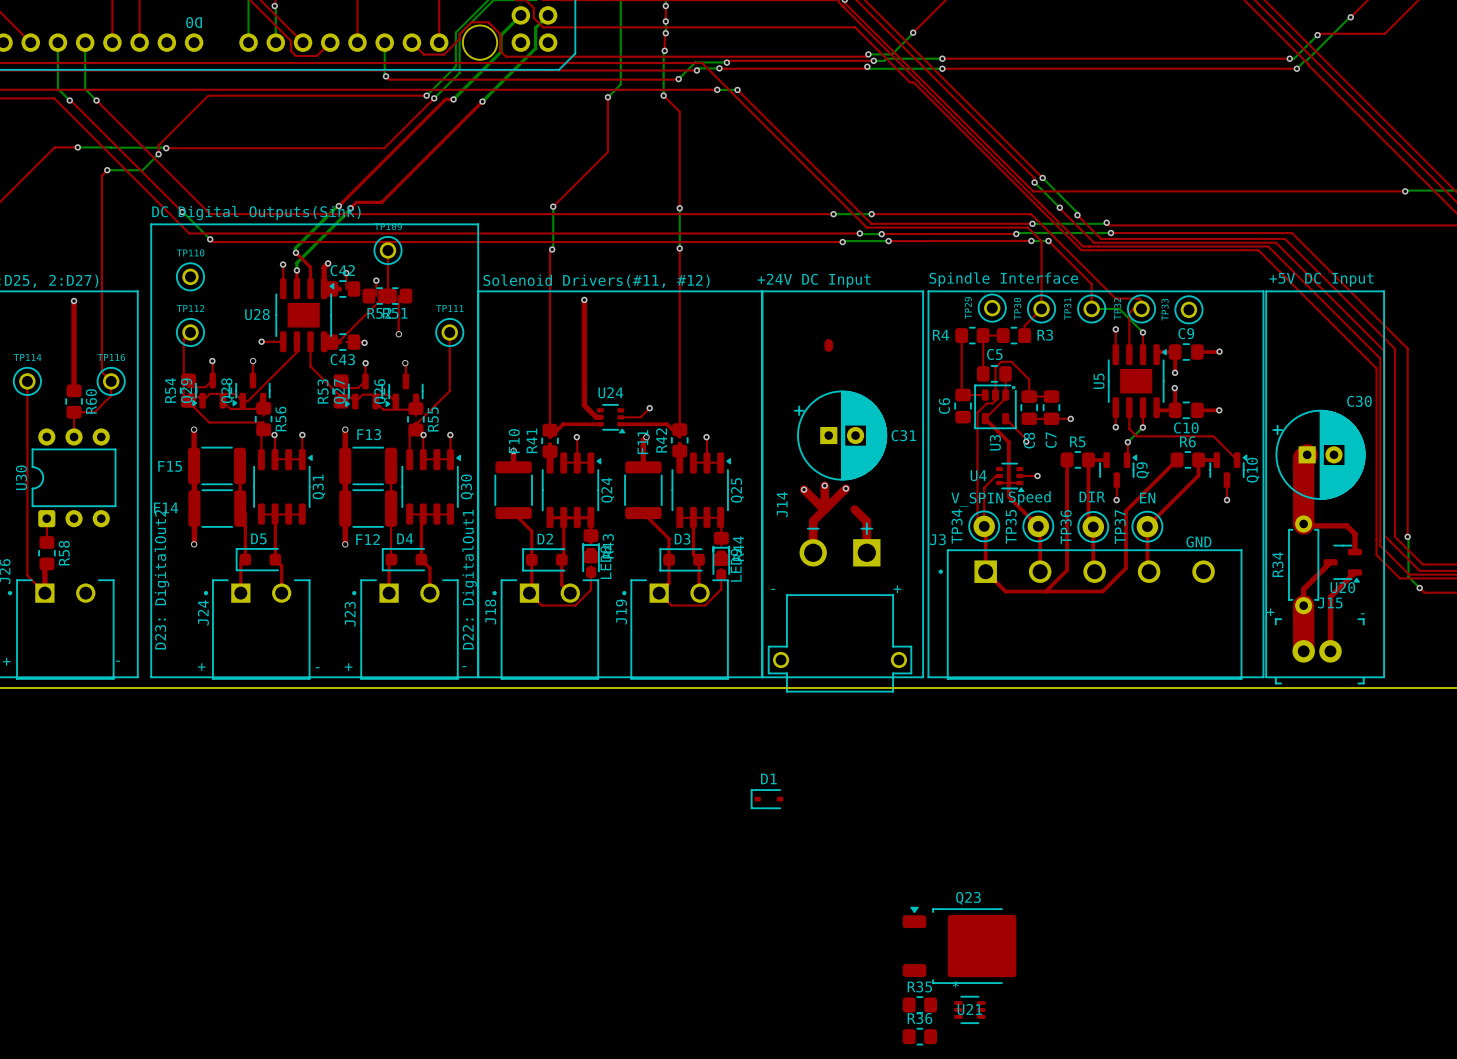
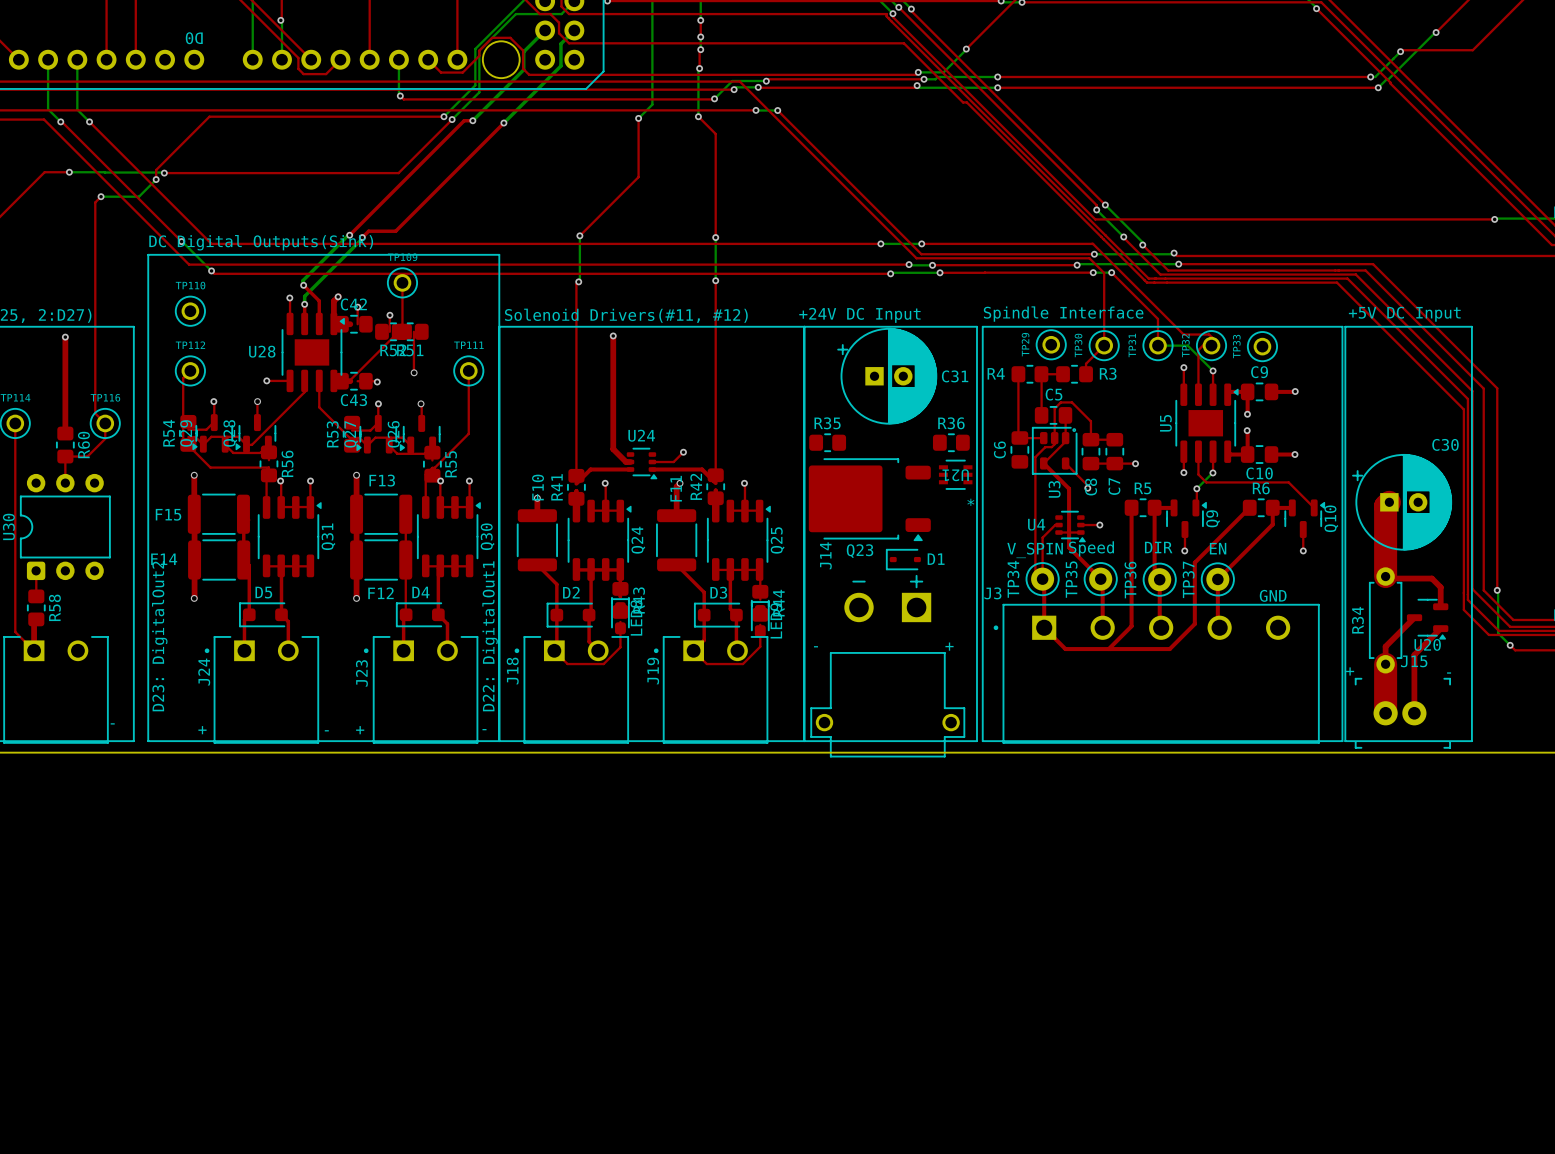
top track: (828, 343) (828, 347) -> none
C31 position: (840, 435) -> (887, 376)
top track: (824, 485) (824, 509) (813, 521) (813, 552) -> none
via: (824, 485) -> none
top track: (845, 488) (825, 509) -> none
via: (845, 488) -> none
top track: (804, 489) (823, 509) -> none
via: (804, 489) -> none
top track: (854, 509) (866, 521) (866, 552) -> none
D1 name position: D1 (768, 778) -> D1 (936, 559)
D1 position: (767, 799) -> (903, 559)
Q23 rotation: 0° (959, 945) -> 180° (869, 499)
Q23 position: (959, 945) -> (869, 499)
R35 position: (919, 1005) -> (827, 442)
U21 rotation: 0° (969, 1009) -> 180° (955, 474)
U21 position: (969, 1009) -> (955, 474)
R36 position: (919, 1036) -> (951, 442)

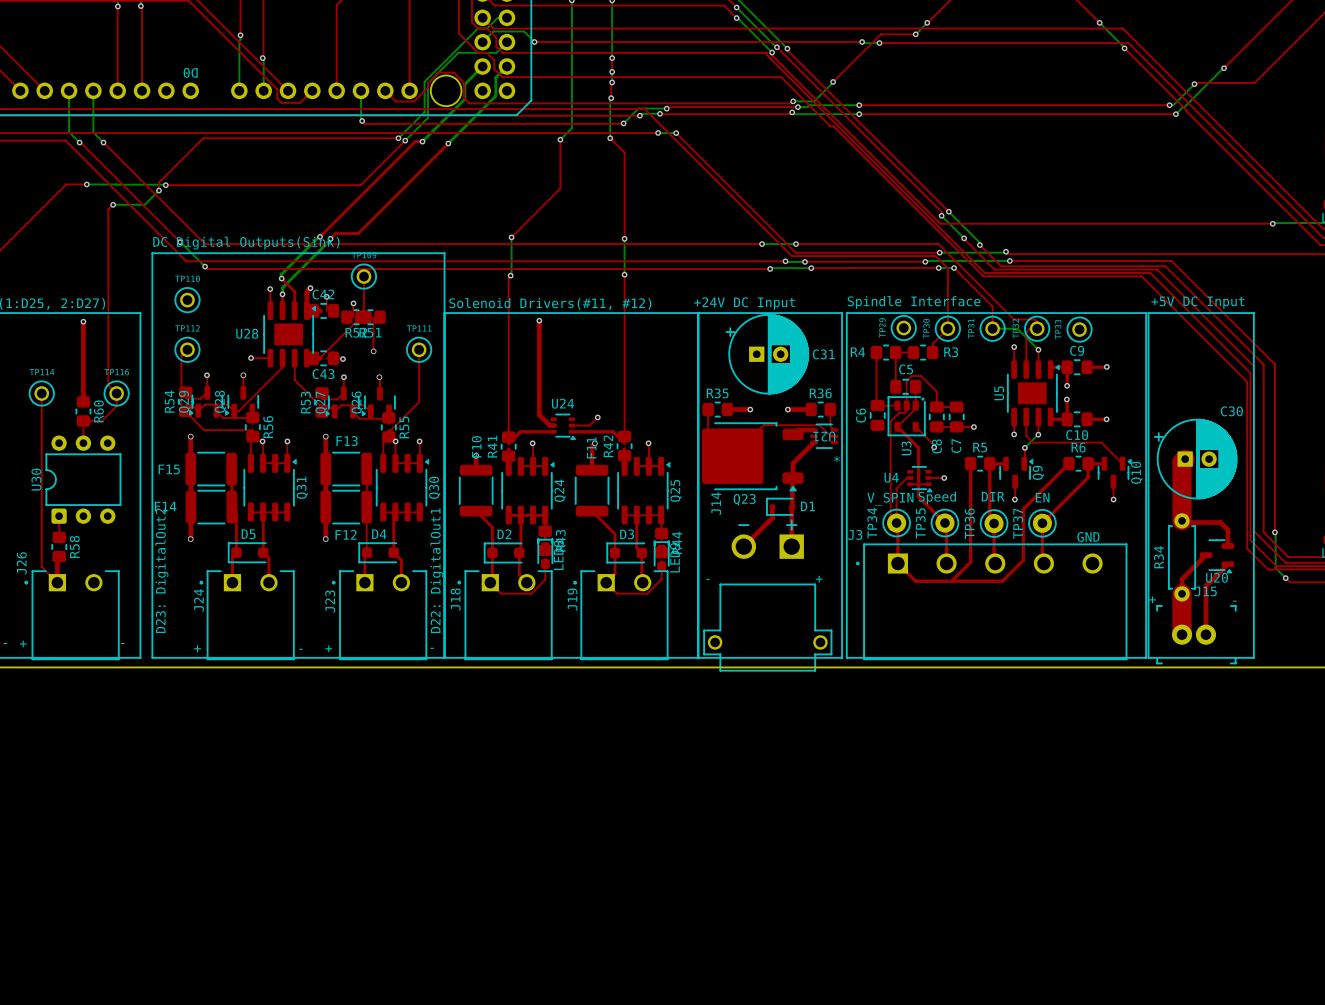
top track: none -> (708, 409) (708, 431) (732, 456) (763, 425) (819, 425) (830, 436) (834, 436)
top track: none -> (727, 409) (750, 409)
via: none -> (750, 409)
top track: none -> (787, 409) (811, 409)
via: none -> (787, 409)
top track: none -> (830, 409) (830, 425) (834, 430)
top track: none -> (814, 430) (797, 430) (793, 434)
top track: none -> (814, 442) (793, 463) (791, 546)
top track: none -> (772, 506) (772, 518) (743, 546)

